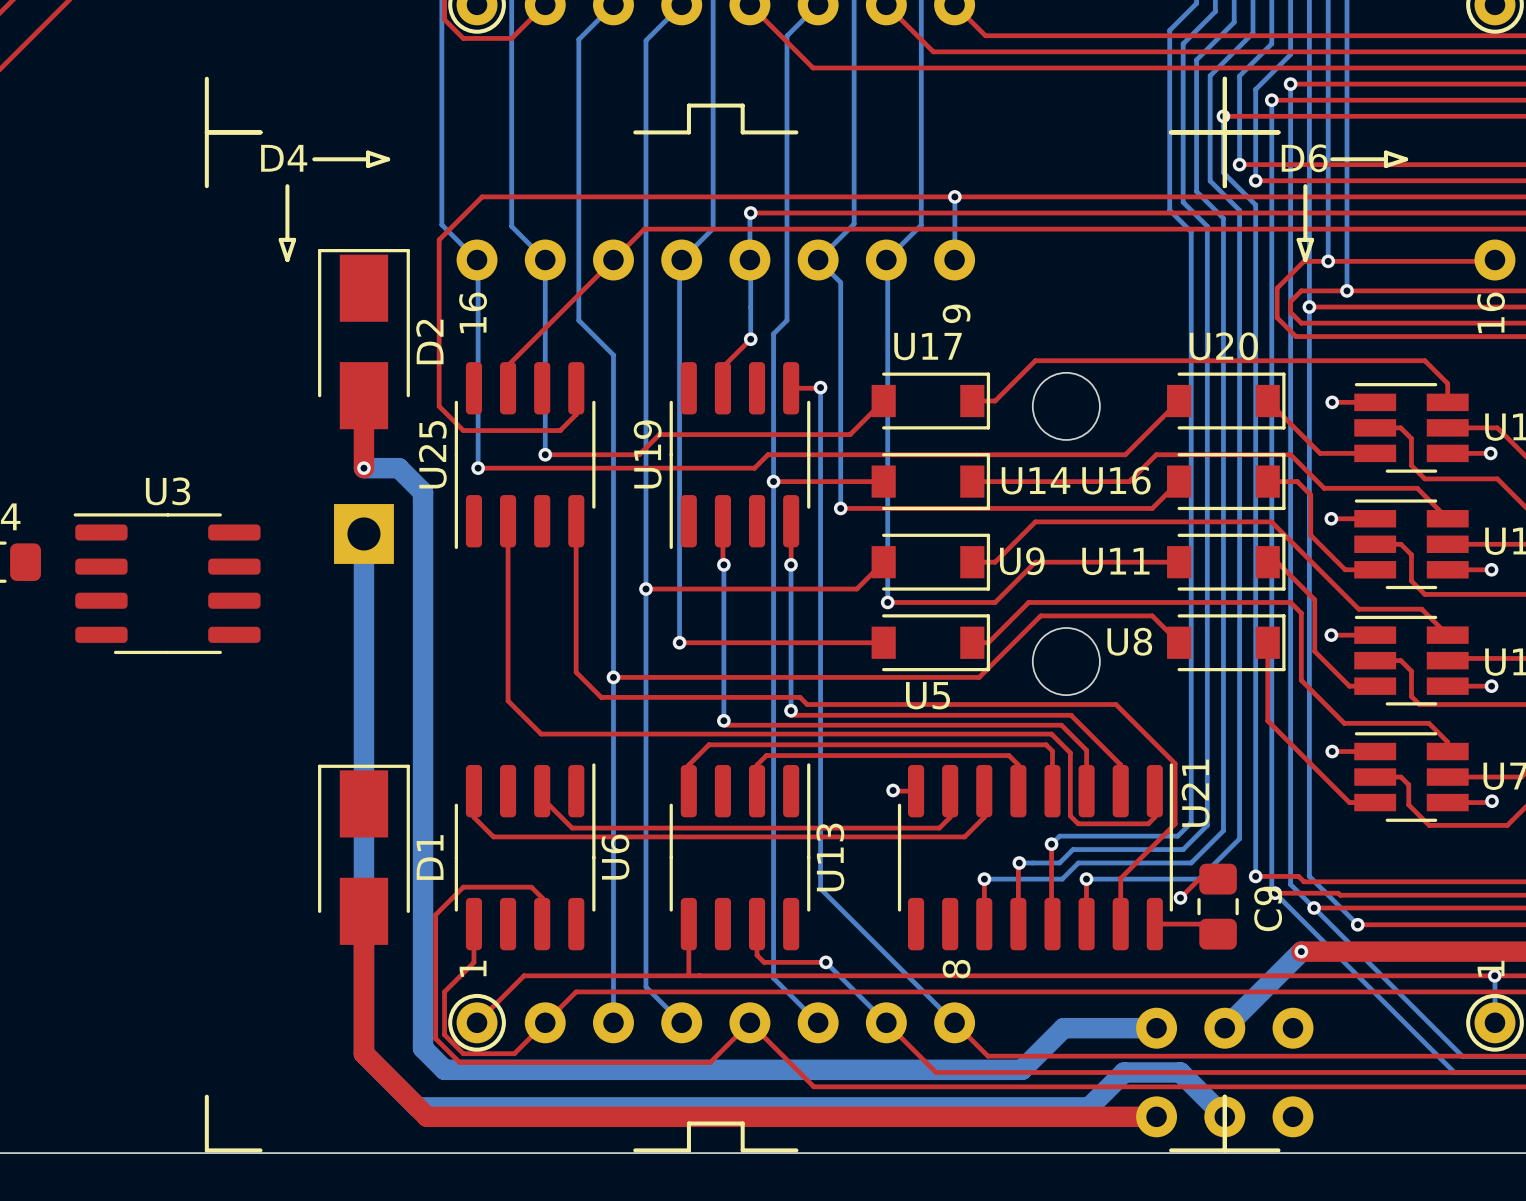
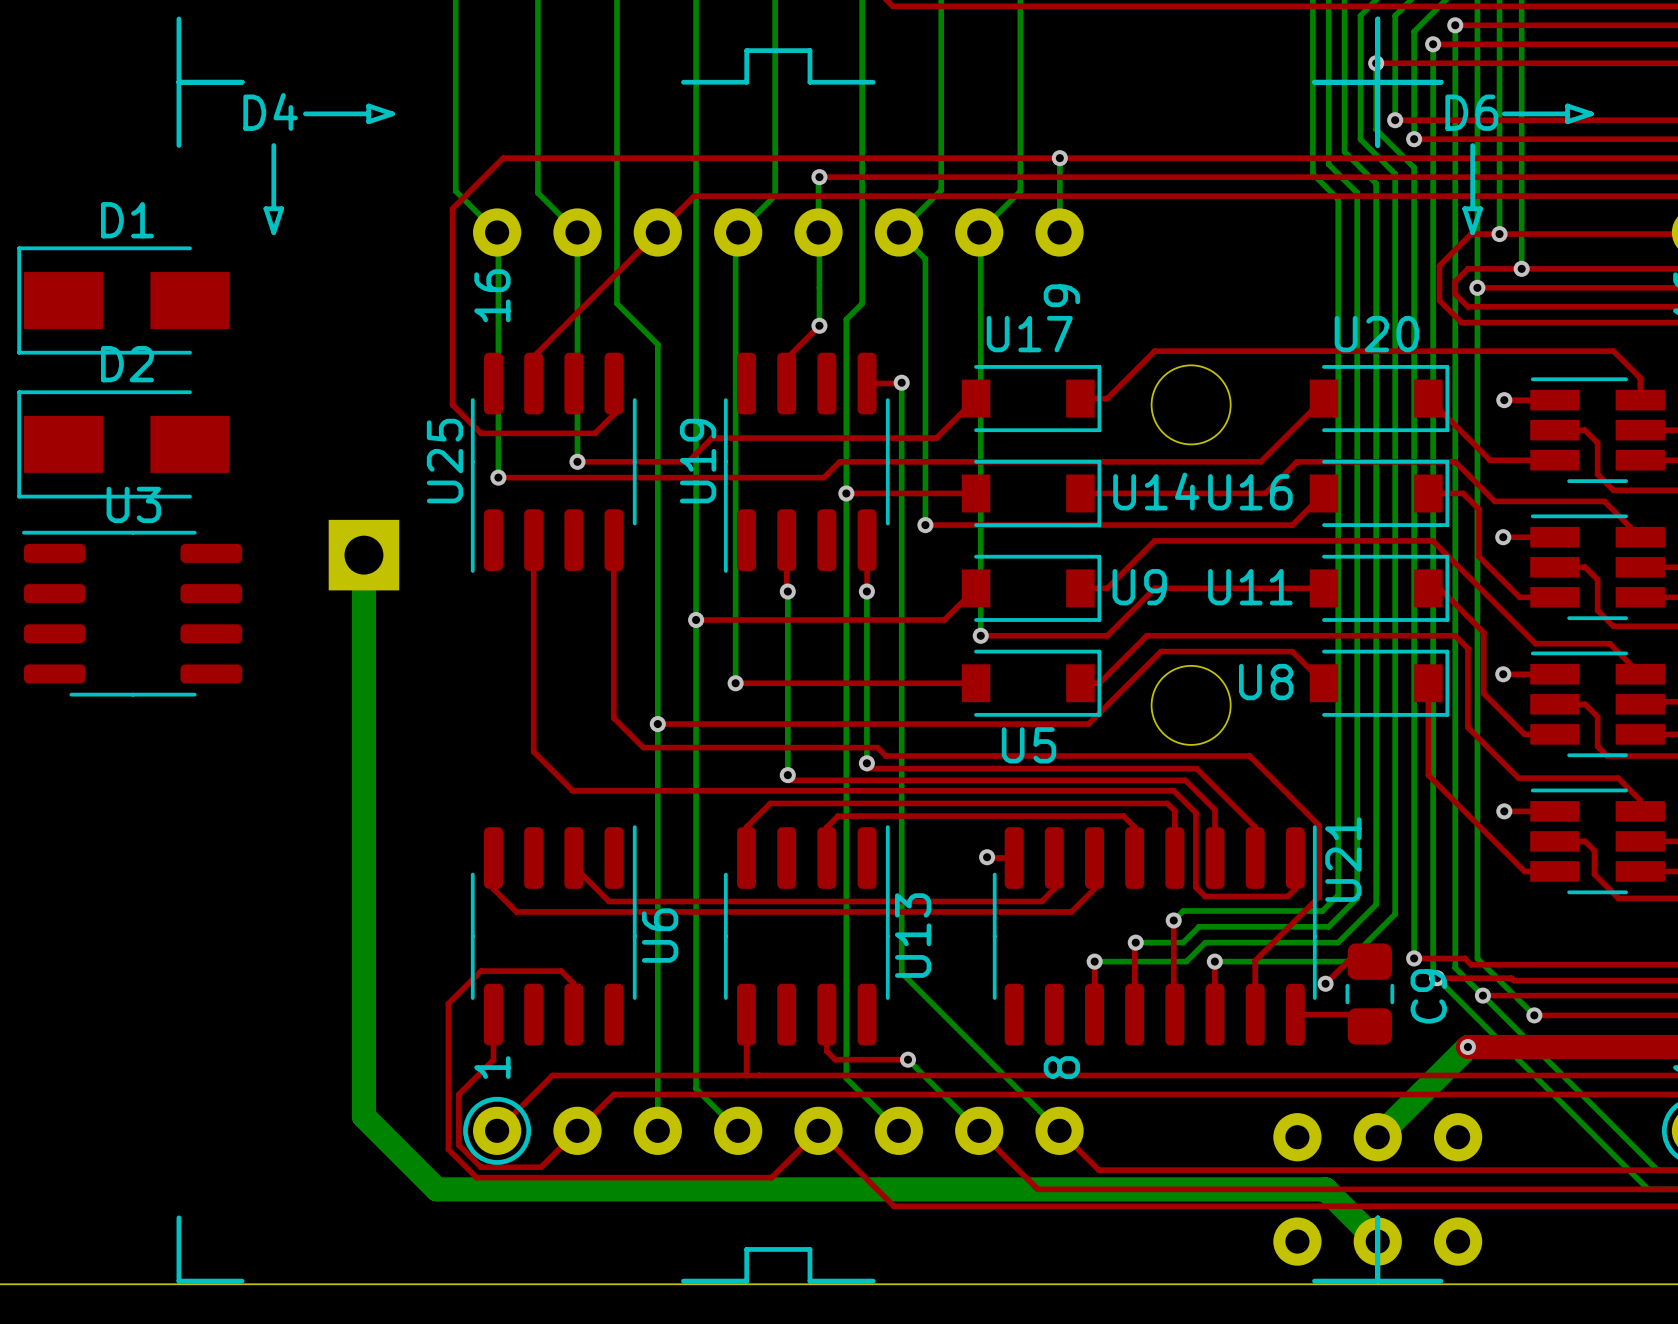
D2 rotation: 0° (363, 339) -> 90° counterclockwise (123, 444)
D2 position: (363, 339) -> (123, 444)
top track: (363, 395) (363, 468) -> none
bottom track: (363, 468) (398, 468) (423, 492) (423, 1048) (444, 1069) (1022, 1069) (1063, 1028) (1156, 1028) -> none
via: (363, 468) -> none
D1 rotation: 0° (363, 854) -> 90° counterclockwise (123, 300)
D1 position: (363, 854) -> (123, 300)
top track: (363, 911) (363, 1053) (427, 1116) (1156, 1116) -> none
bottom track: (363, 1010) (363, 1053) (417, 1107) (1089, 1107) (1124, 1072) -> (363, 1116) (436, 1189) (1259, 1189)

